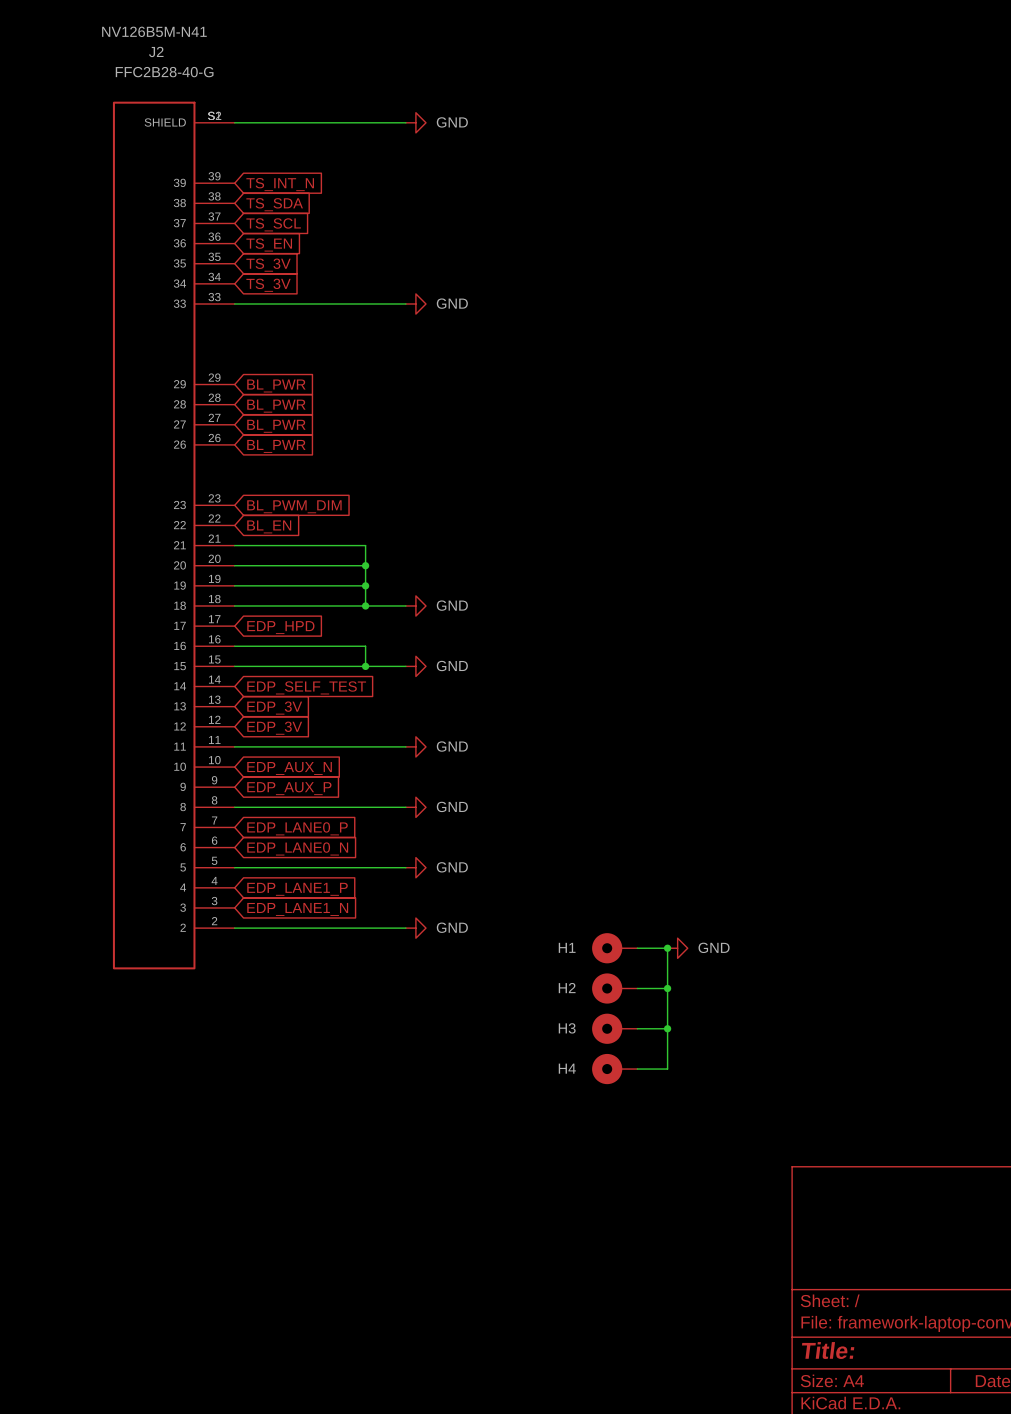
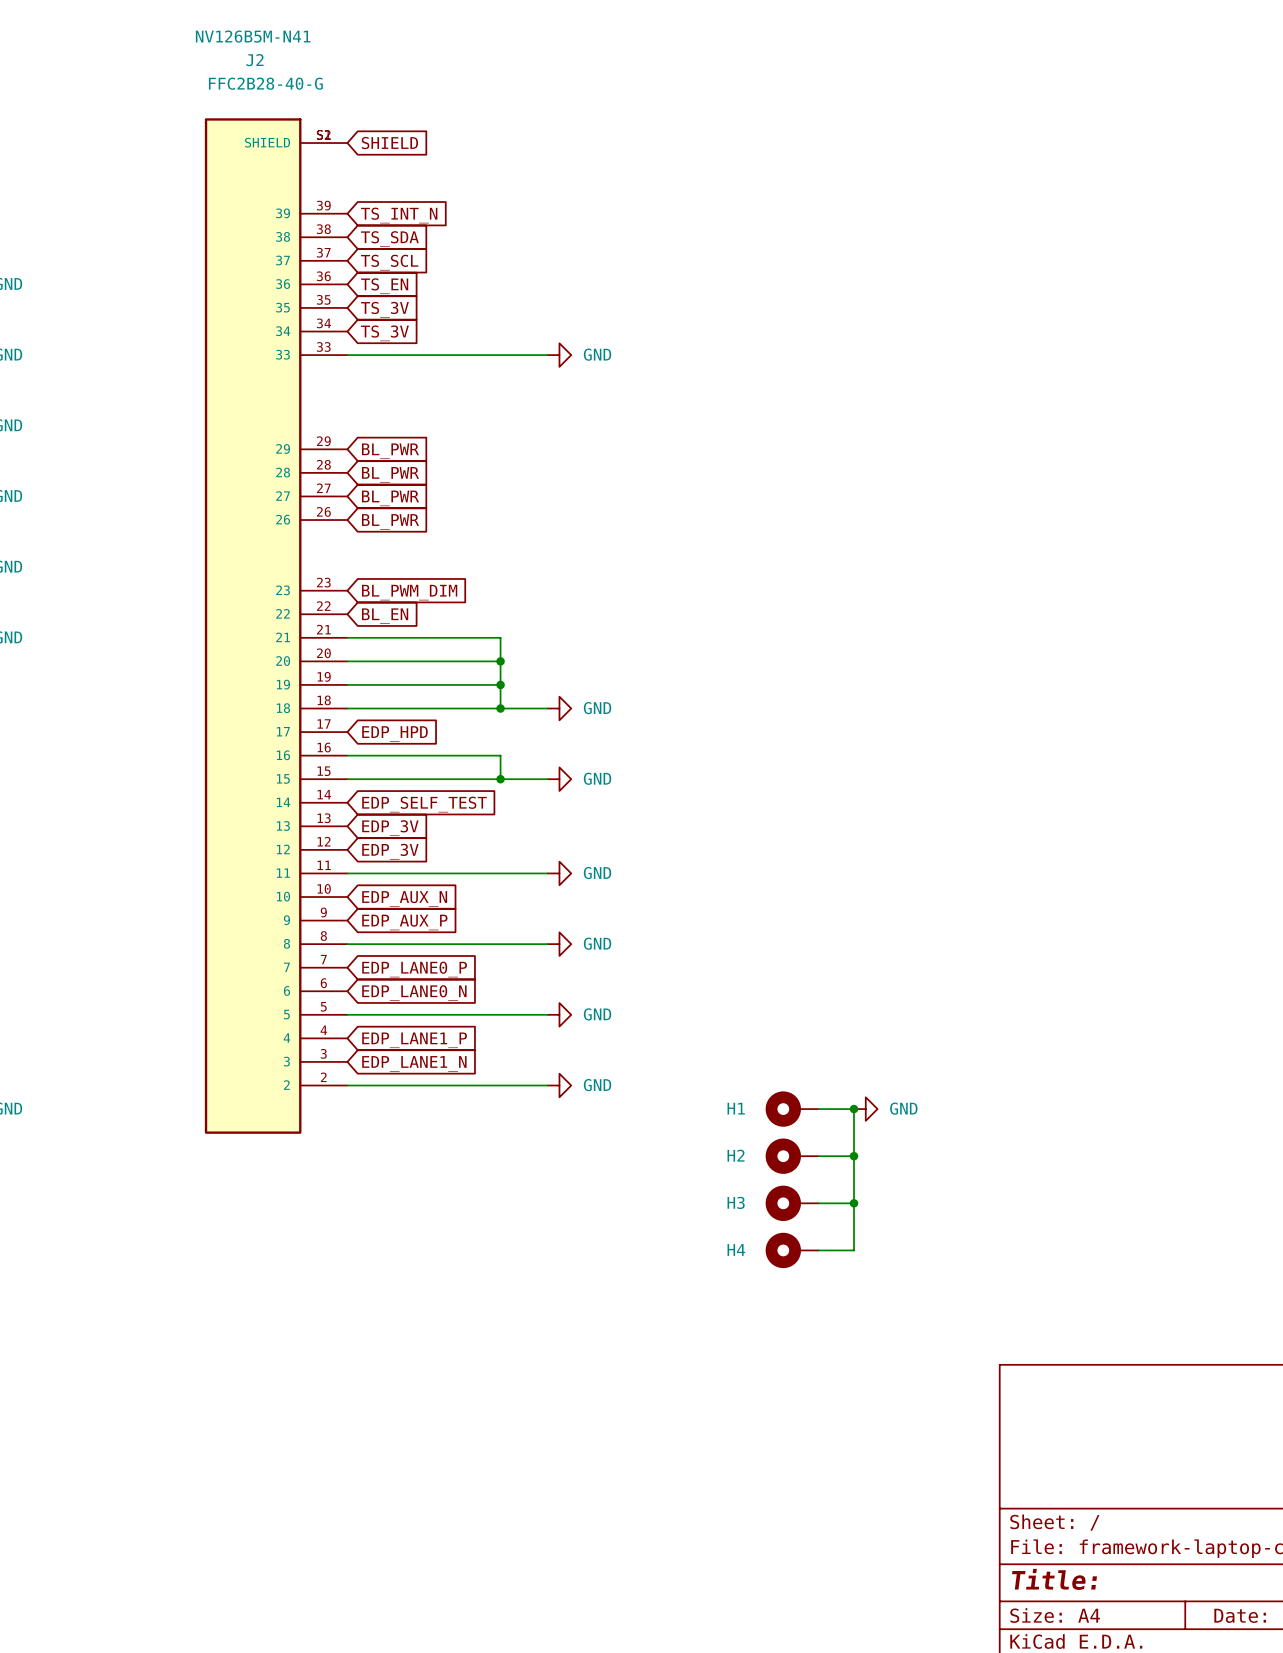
wire: (234, 122) (405, 122) -> none
global label: none -> SHIELD (389, 143)
power symbol: GND (415, 122) -> none

